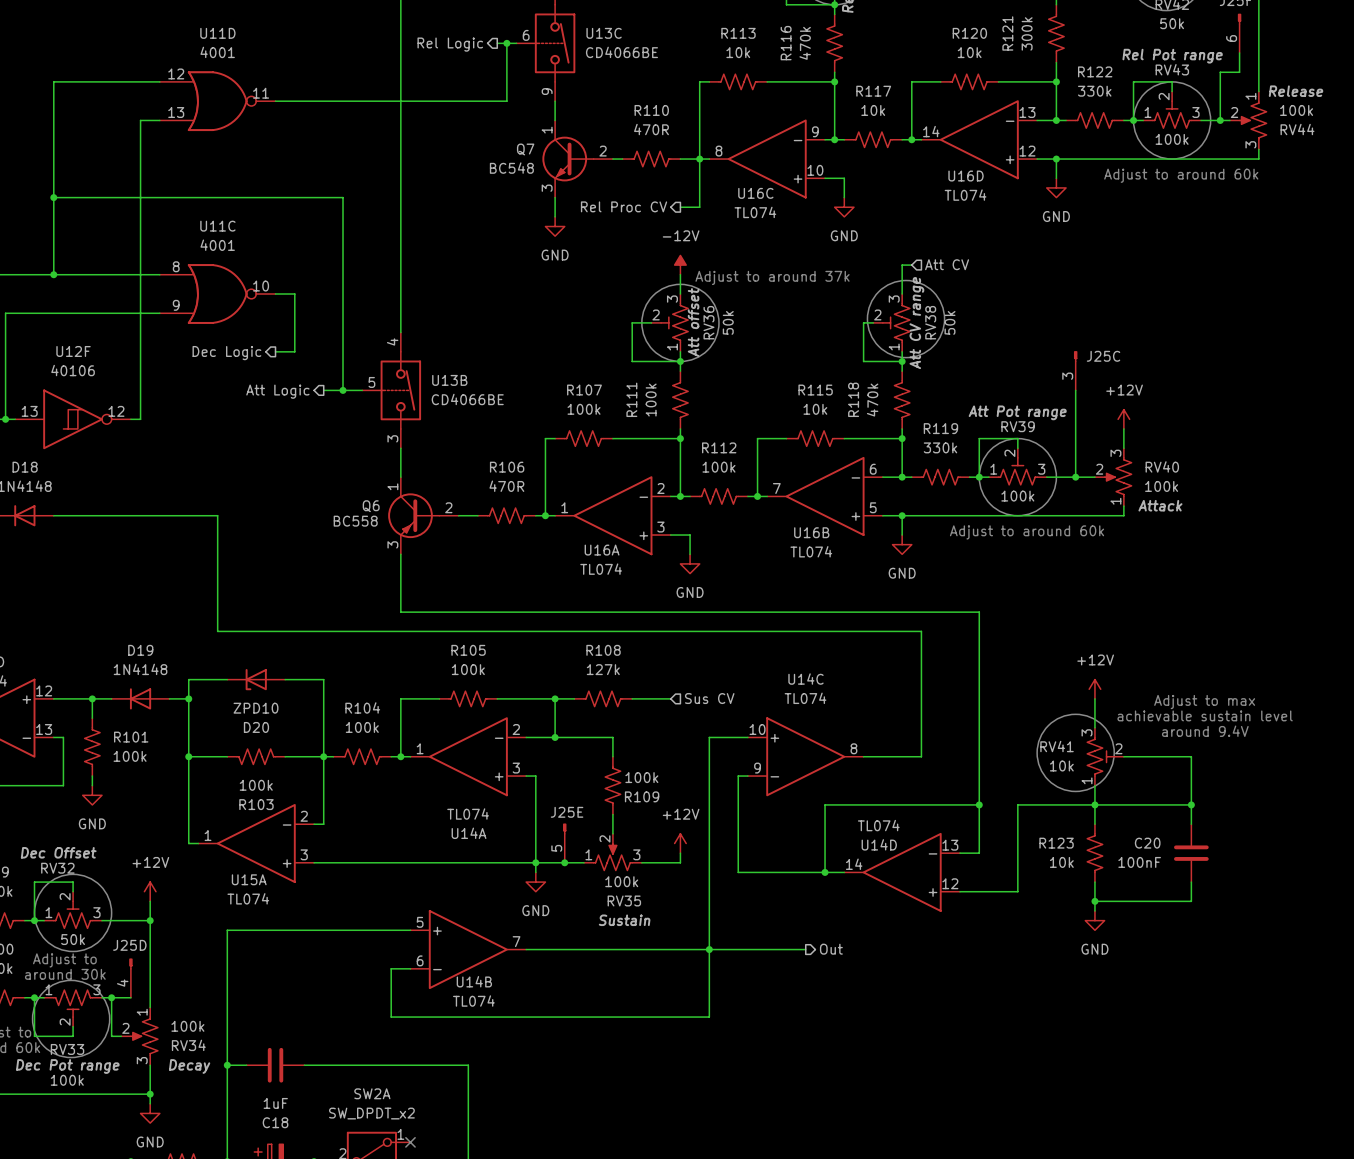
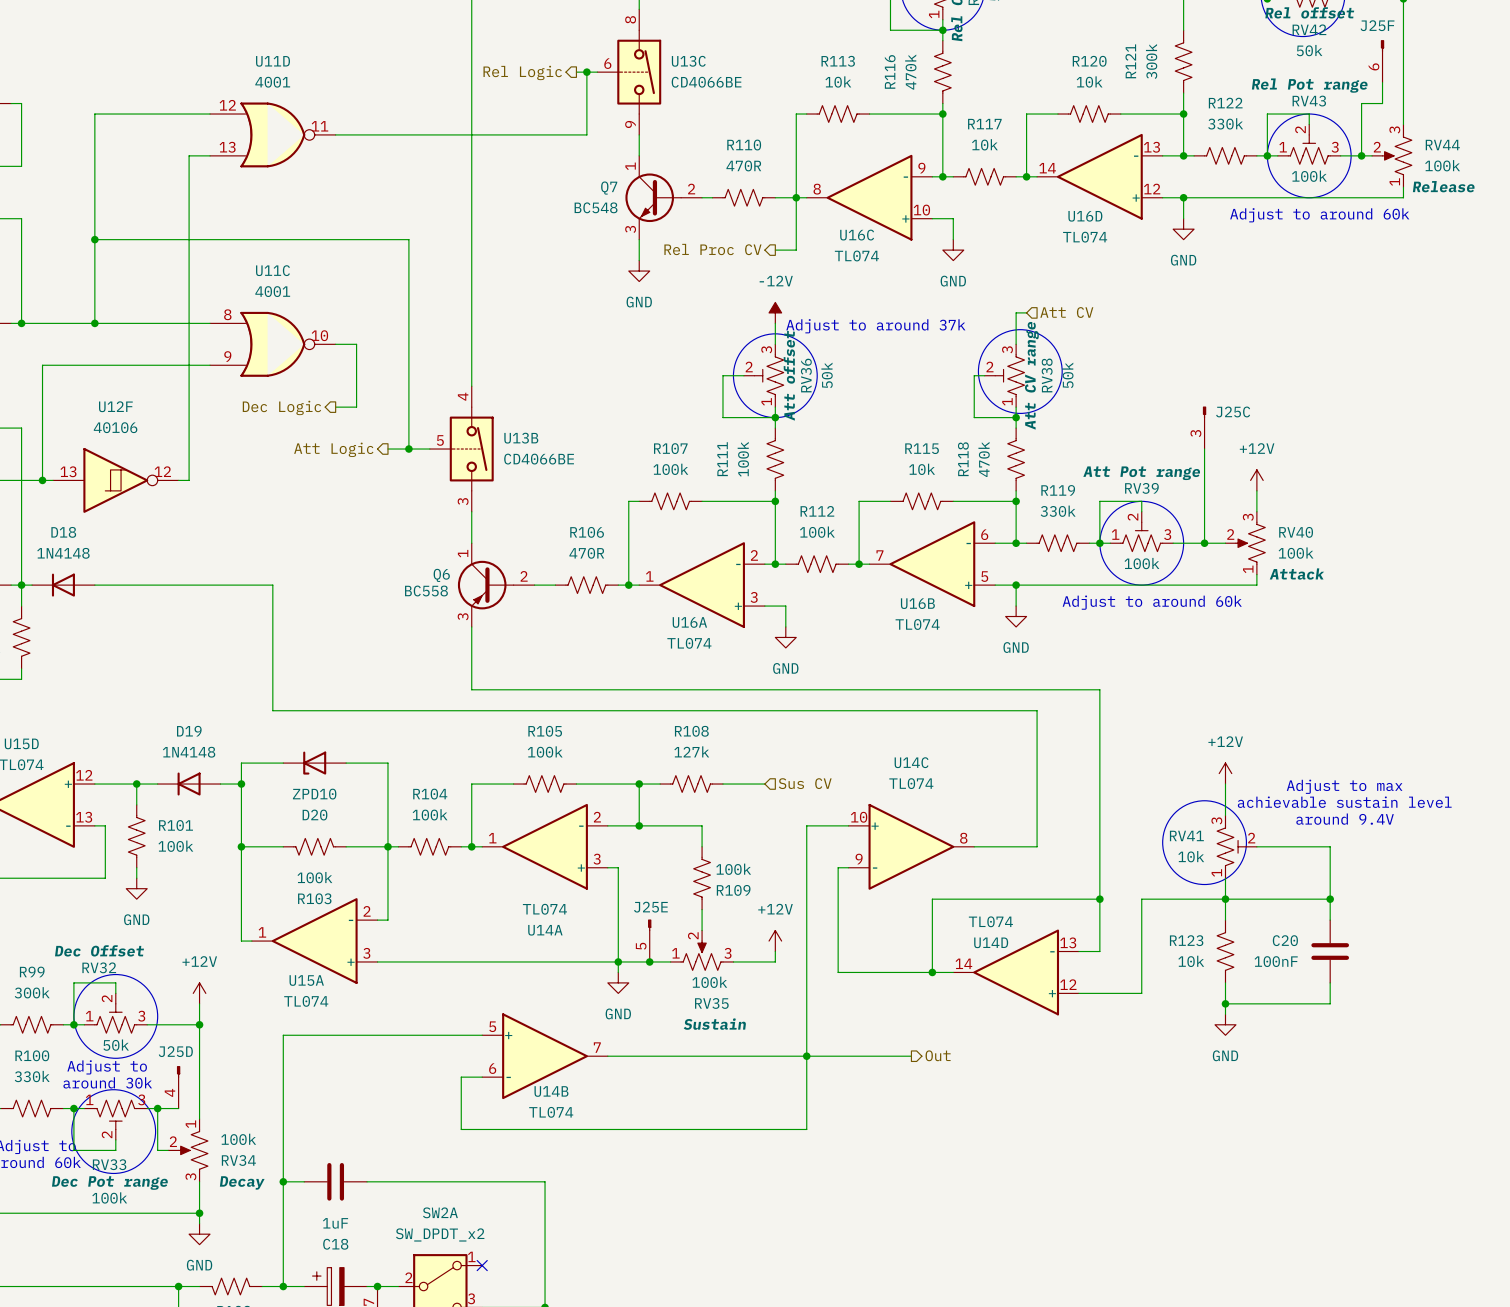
RV44 flip: as is (1253, 120) -> up-down (1397, 155)

